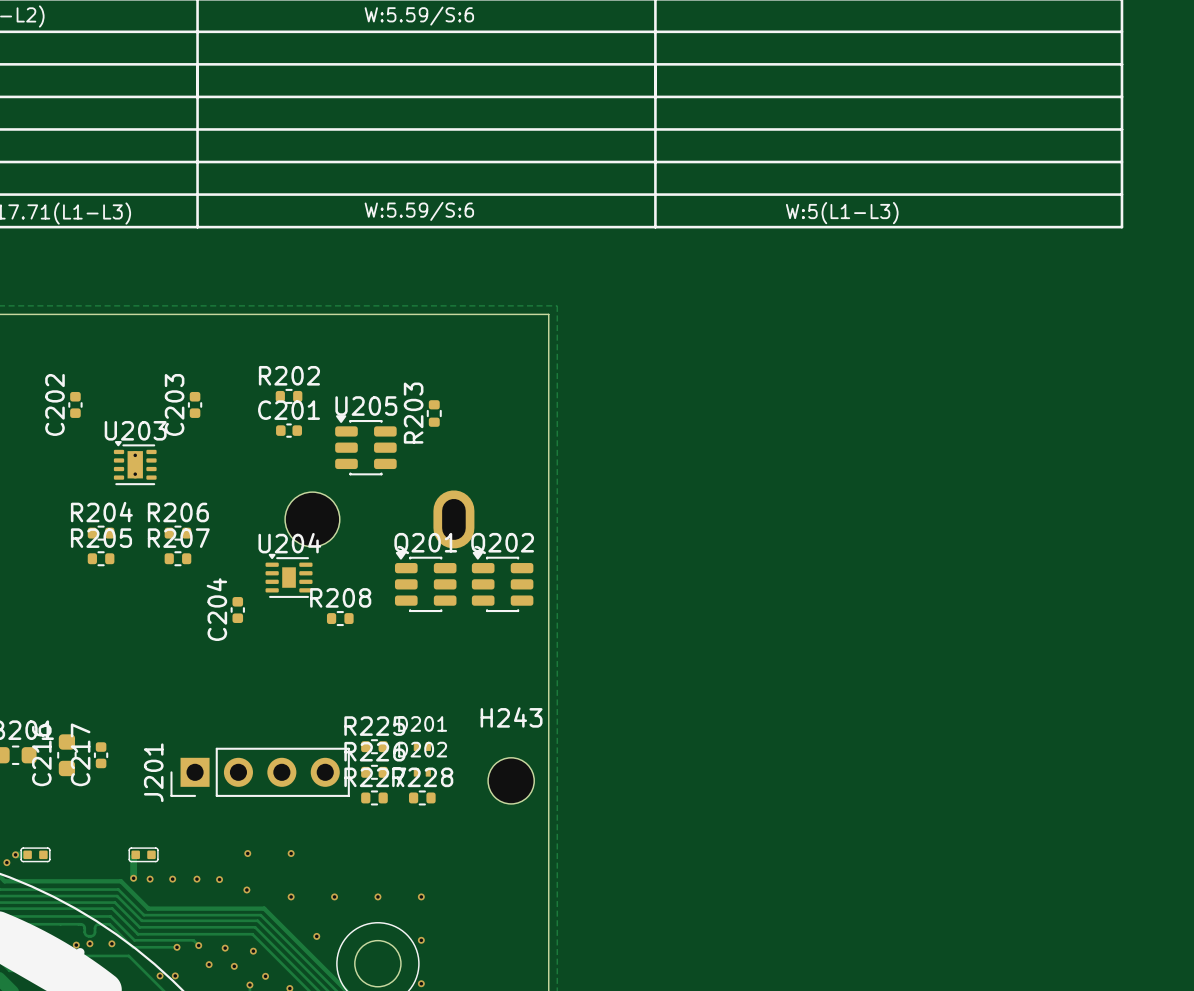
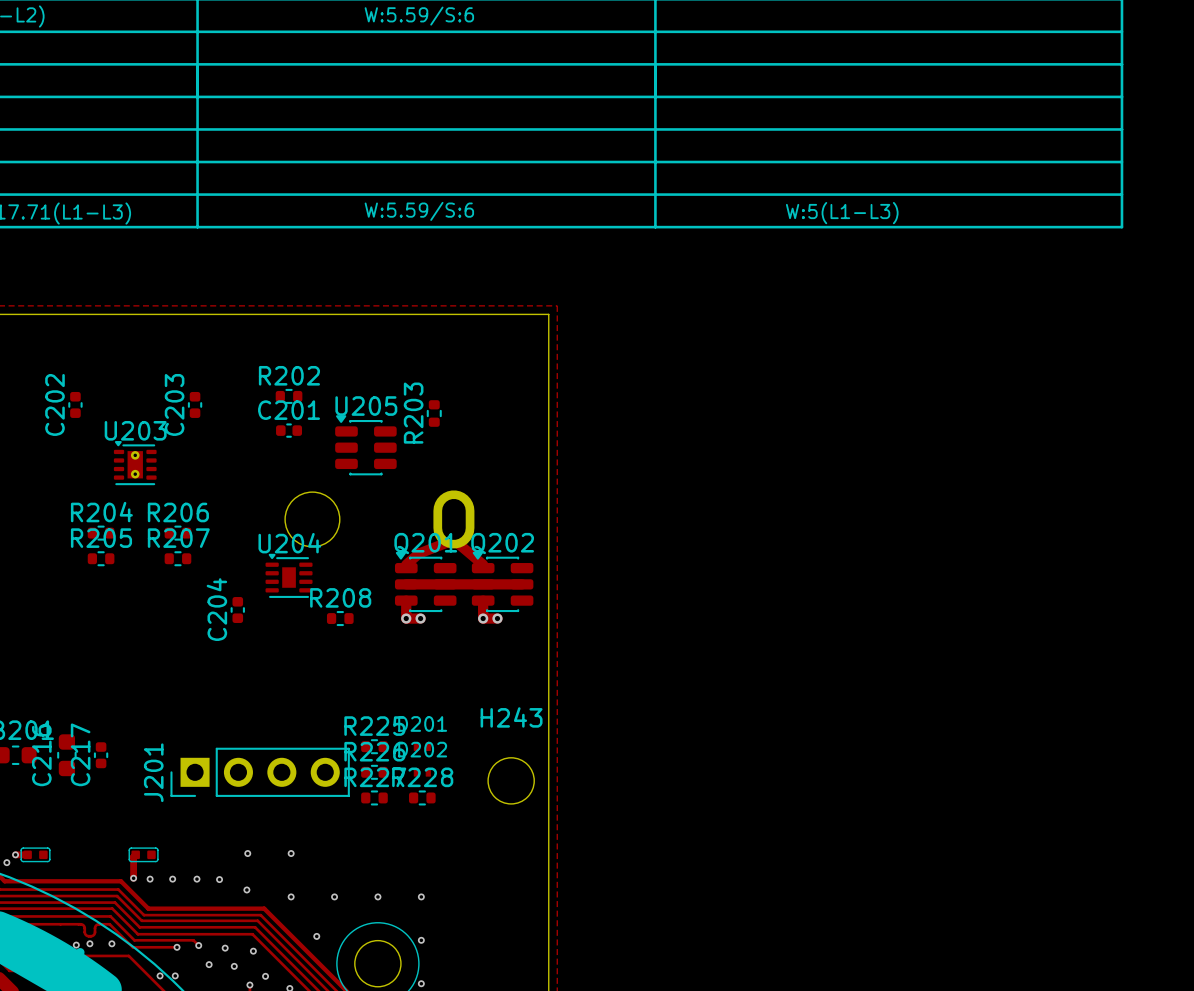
track: none -> (406, 564) (418, 553) (453, 539) (483, 564)
track: none -> (406, 584) (522, 584)
track: none -> (406, 600) (406, 618) (420, 618)
track: none -> (483, 600) (483, 618) (497, 618)
via: none -> (406, 618)
via: none -> (420, 618)
via: none -> (483, 618)
via: none -> (497, 618)

